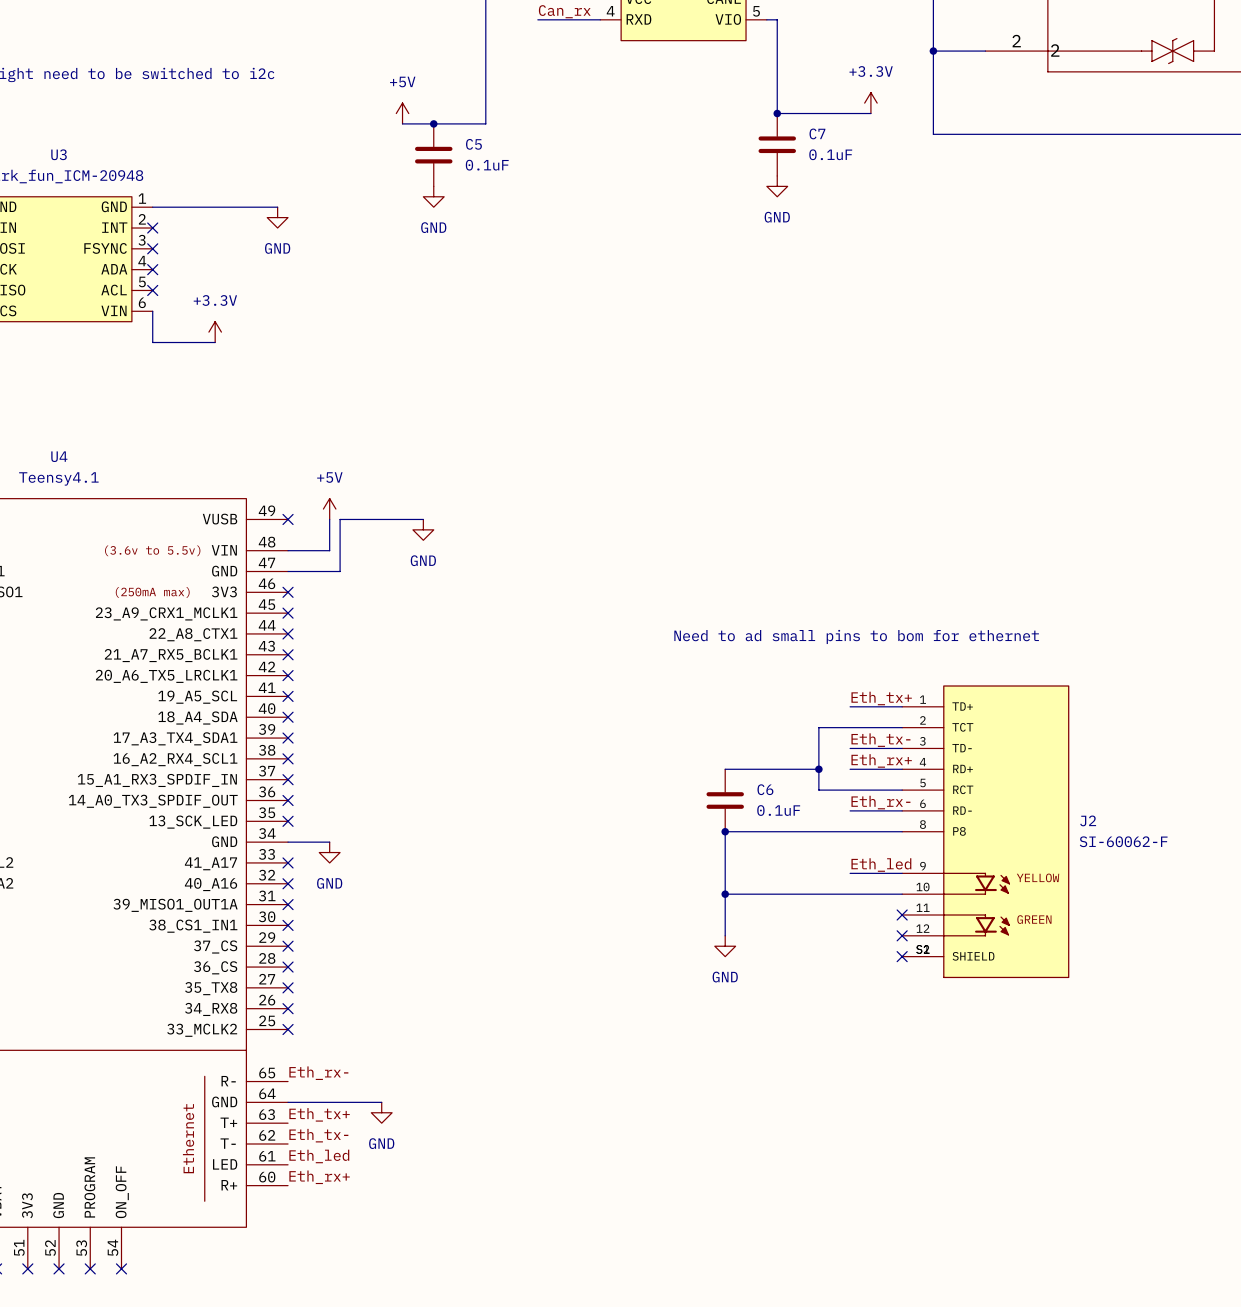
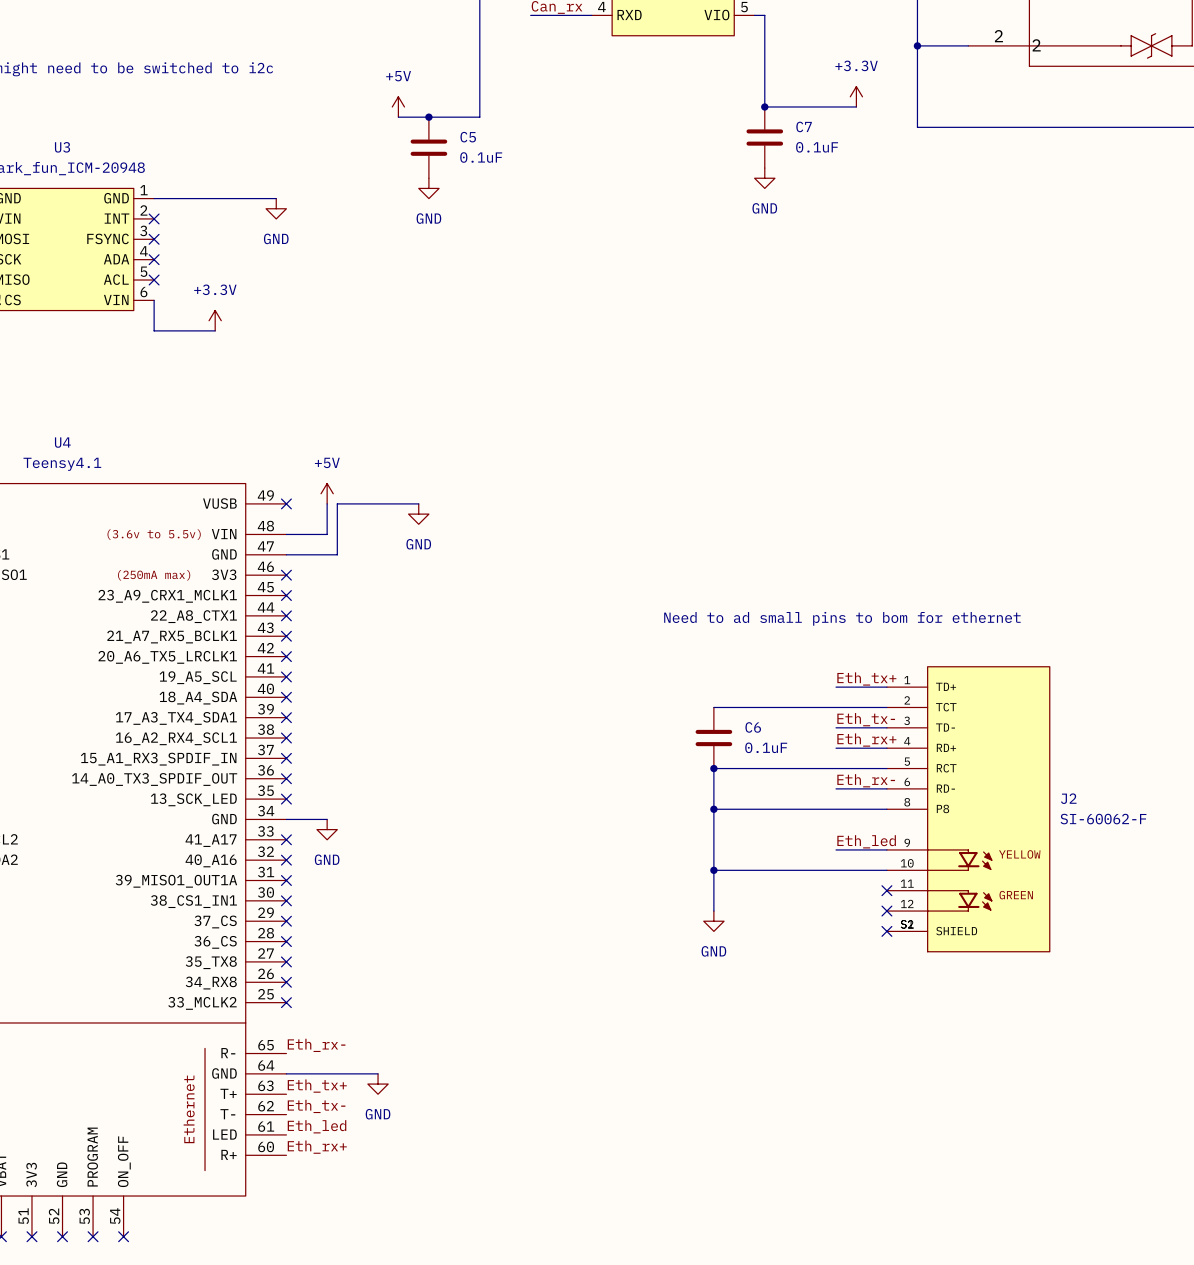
wire: (818, 727) (818, 790) -> (805, 707) (713, 707)
wire: (725, 769) (818, 769) -> none
junction: (818, 769) -> none
junction: none -> (713, 768)
wire: none -> (805, 768) (713, 768) (713, 809)
C6 position: (725, 800) -> (713, 738)

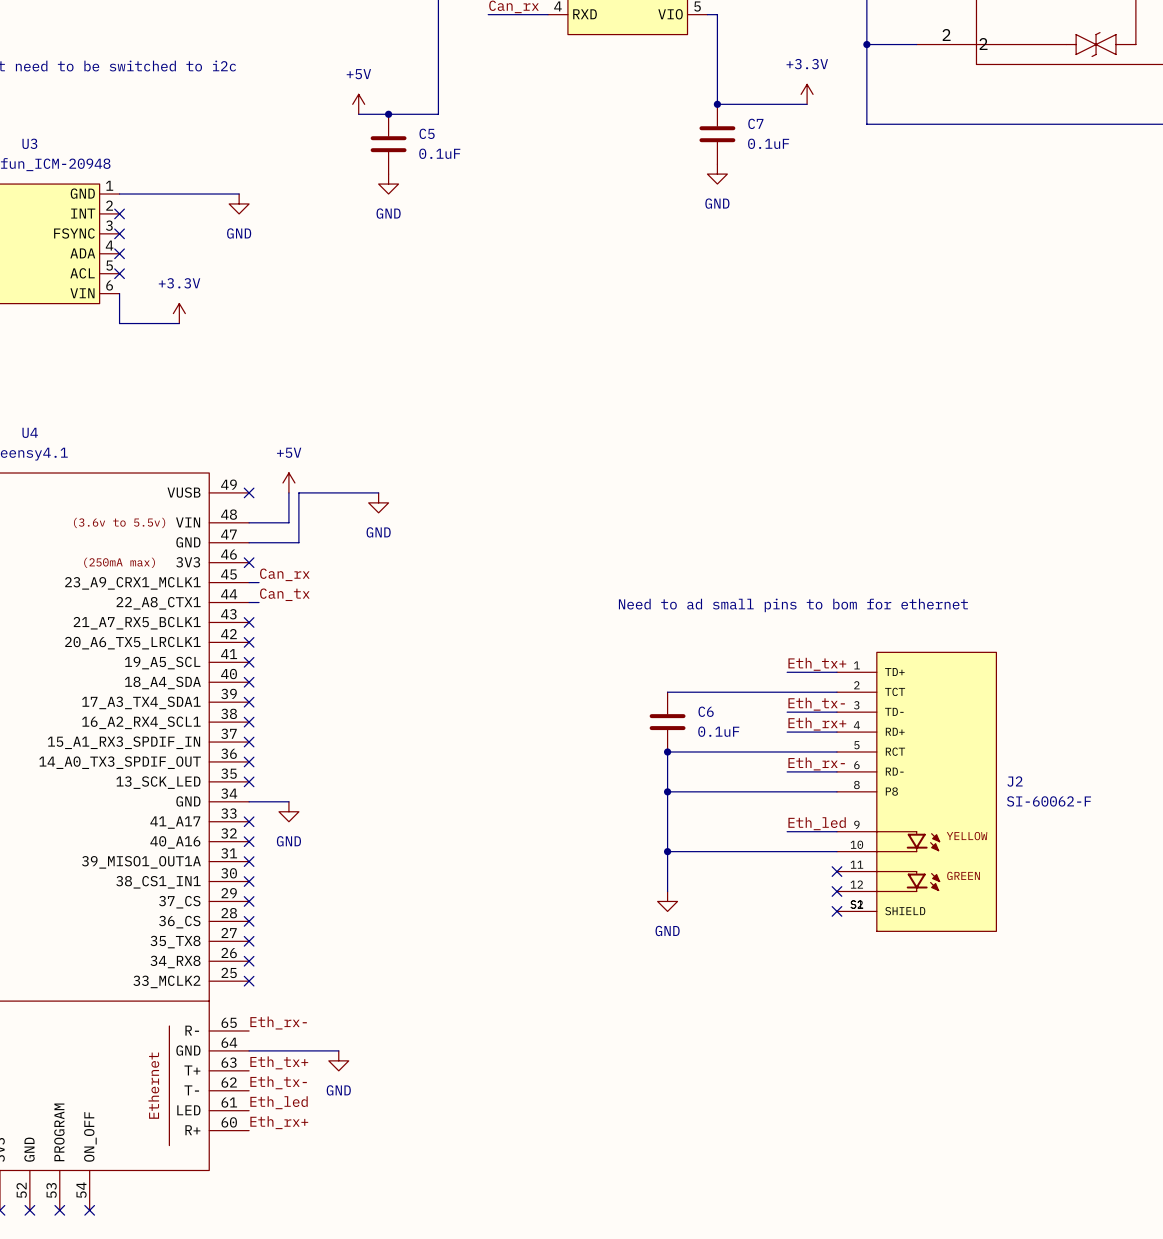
label: none -> Can_rx (284, 574)
wire: none -> (249, 582) (259, 582)
no-connect mark: (286, 595) -> none
label: none -> Can_tx (284, 594)
wire: none -> (249, 602) (259, 602)
no-connect mark: (286, 615) -> none

